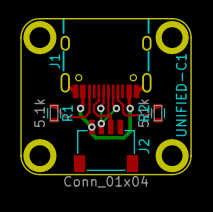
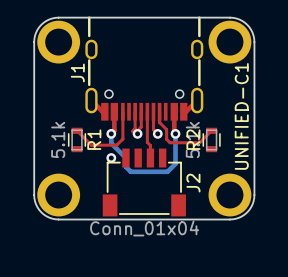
top track: (98, 100) (93, 105) (93, 111) (98, 116) (109, 116) -> (135, 123) (135, 128) (132, 131)
bottom track: (100, 108) (101, 123) (116, 108) -> none
via: (101, 123) -> none
via: none -> (111, 158)
via: (91, 127) -> none

